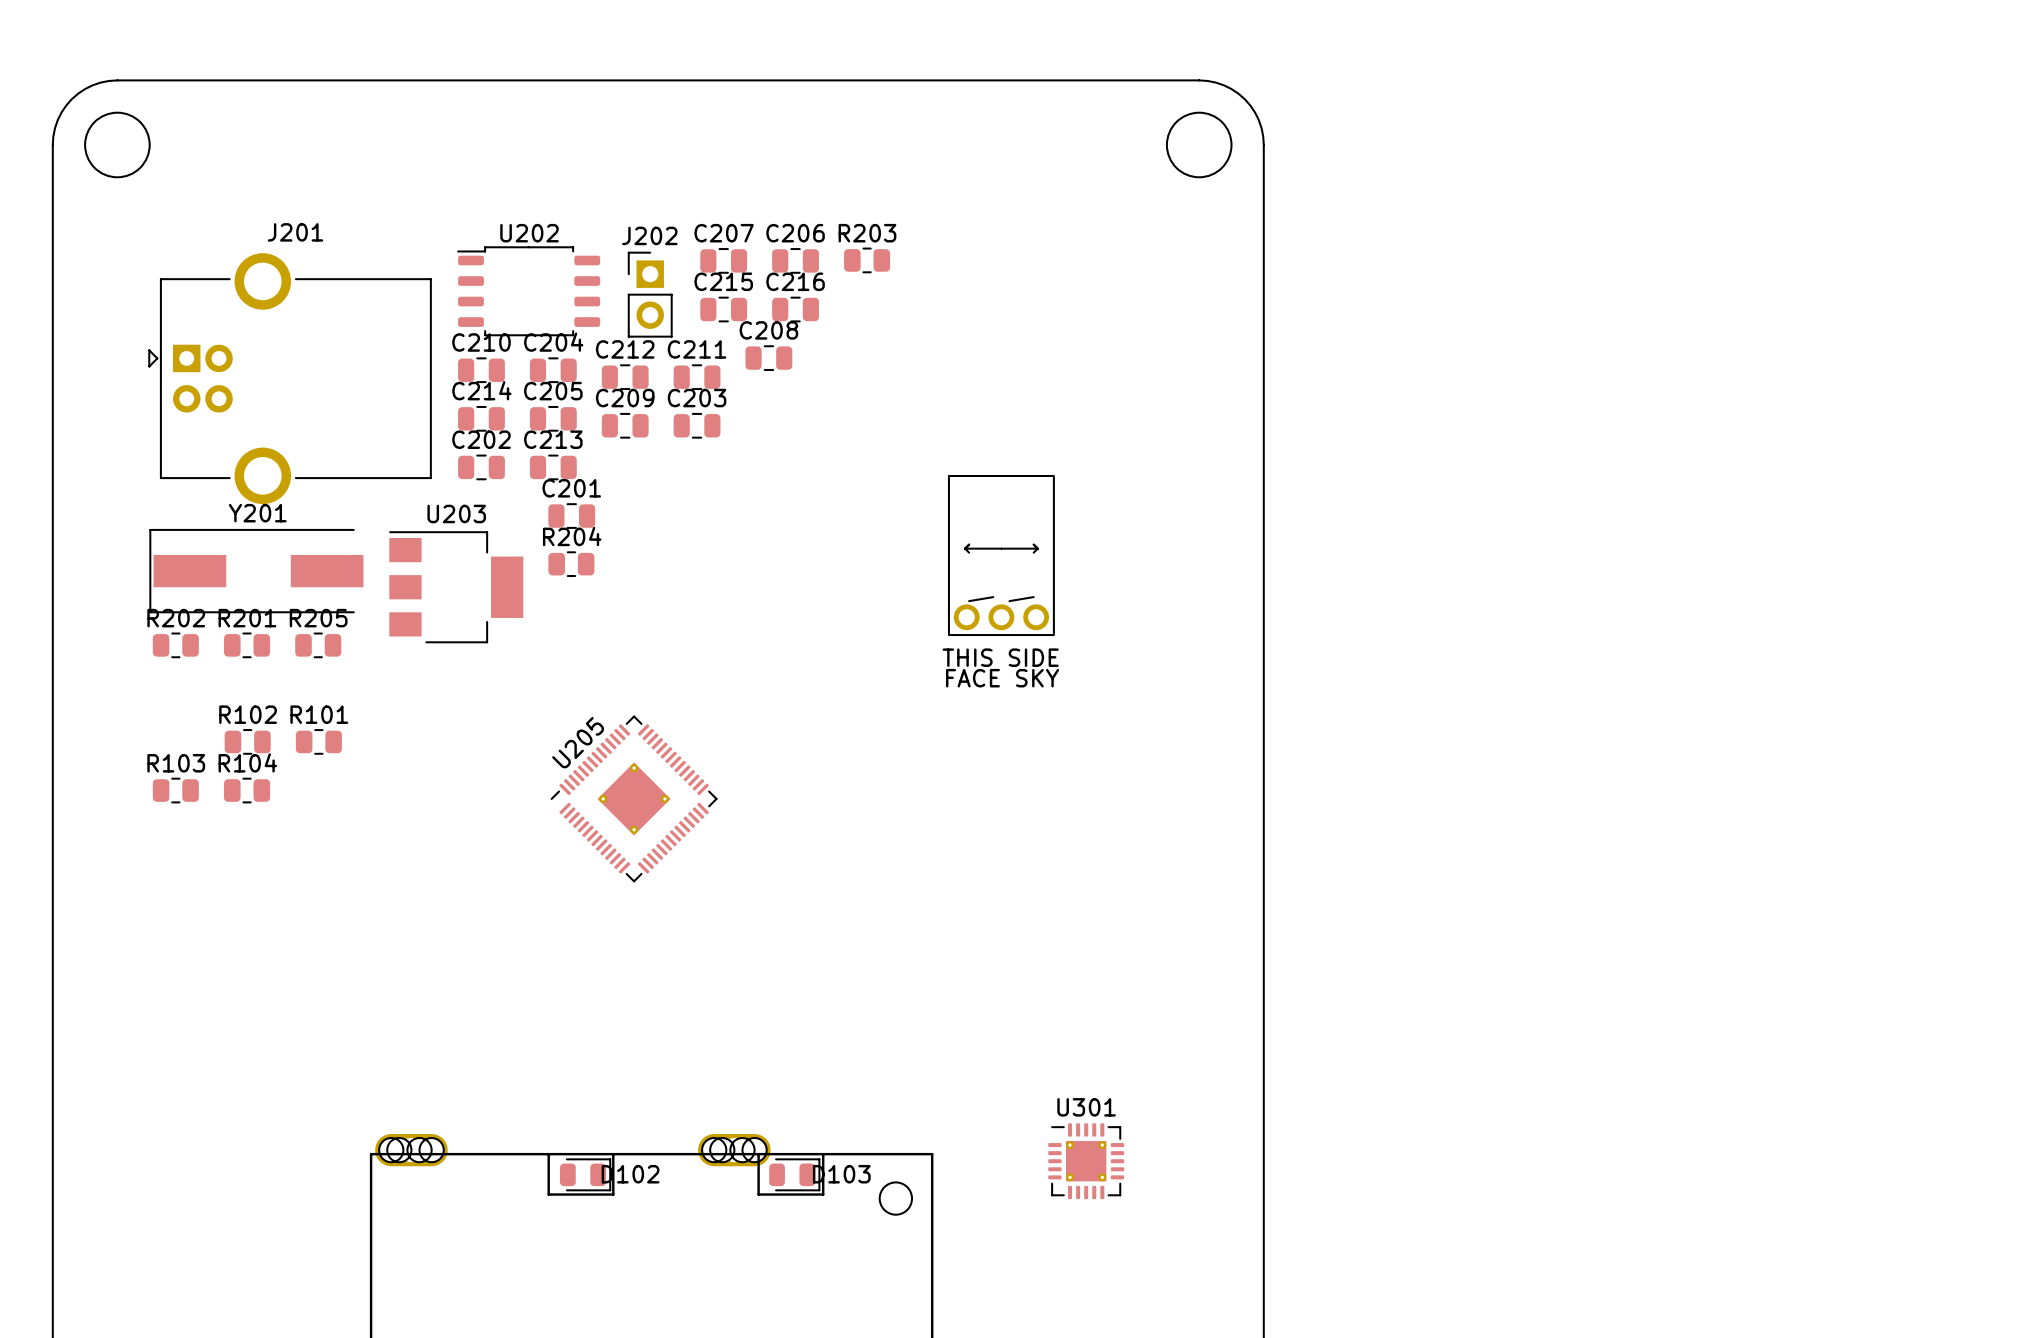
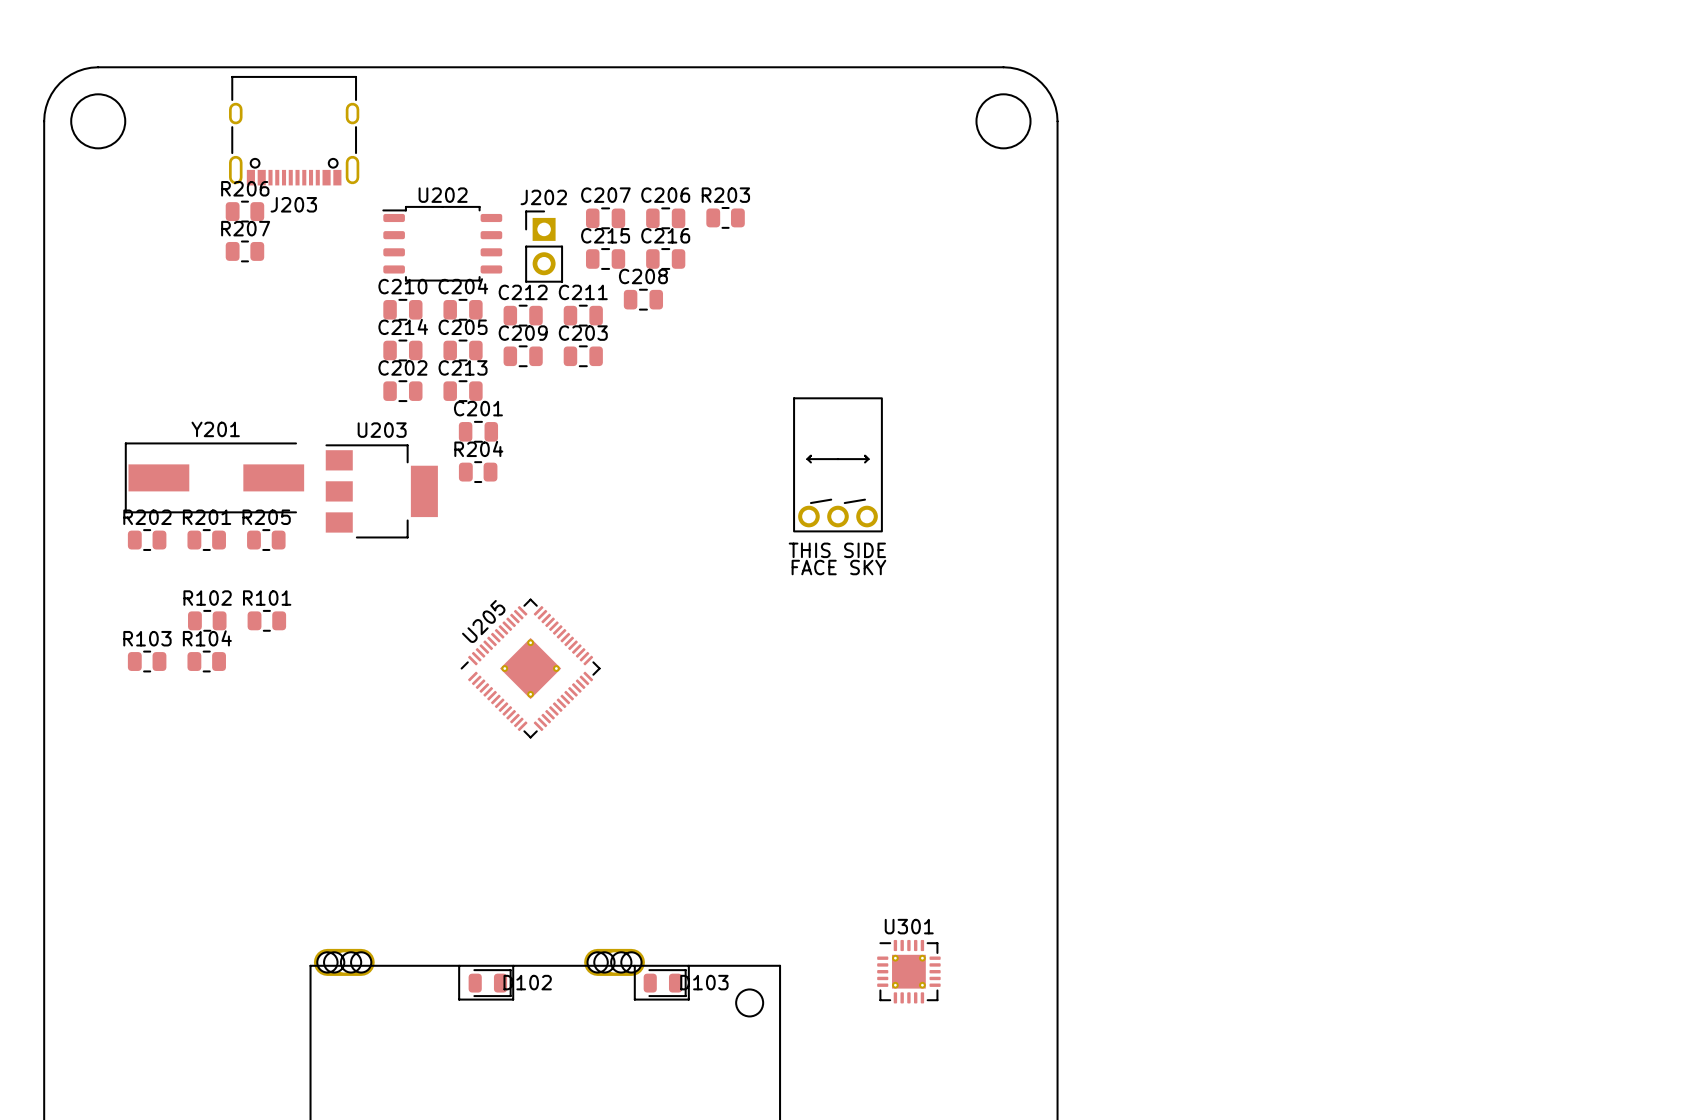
J203: none -> (294, 130)
R206: none -> (244, 211)
R207: none -> (244, 251)
J201: (290, 378) -> none

